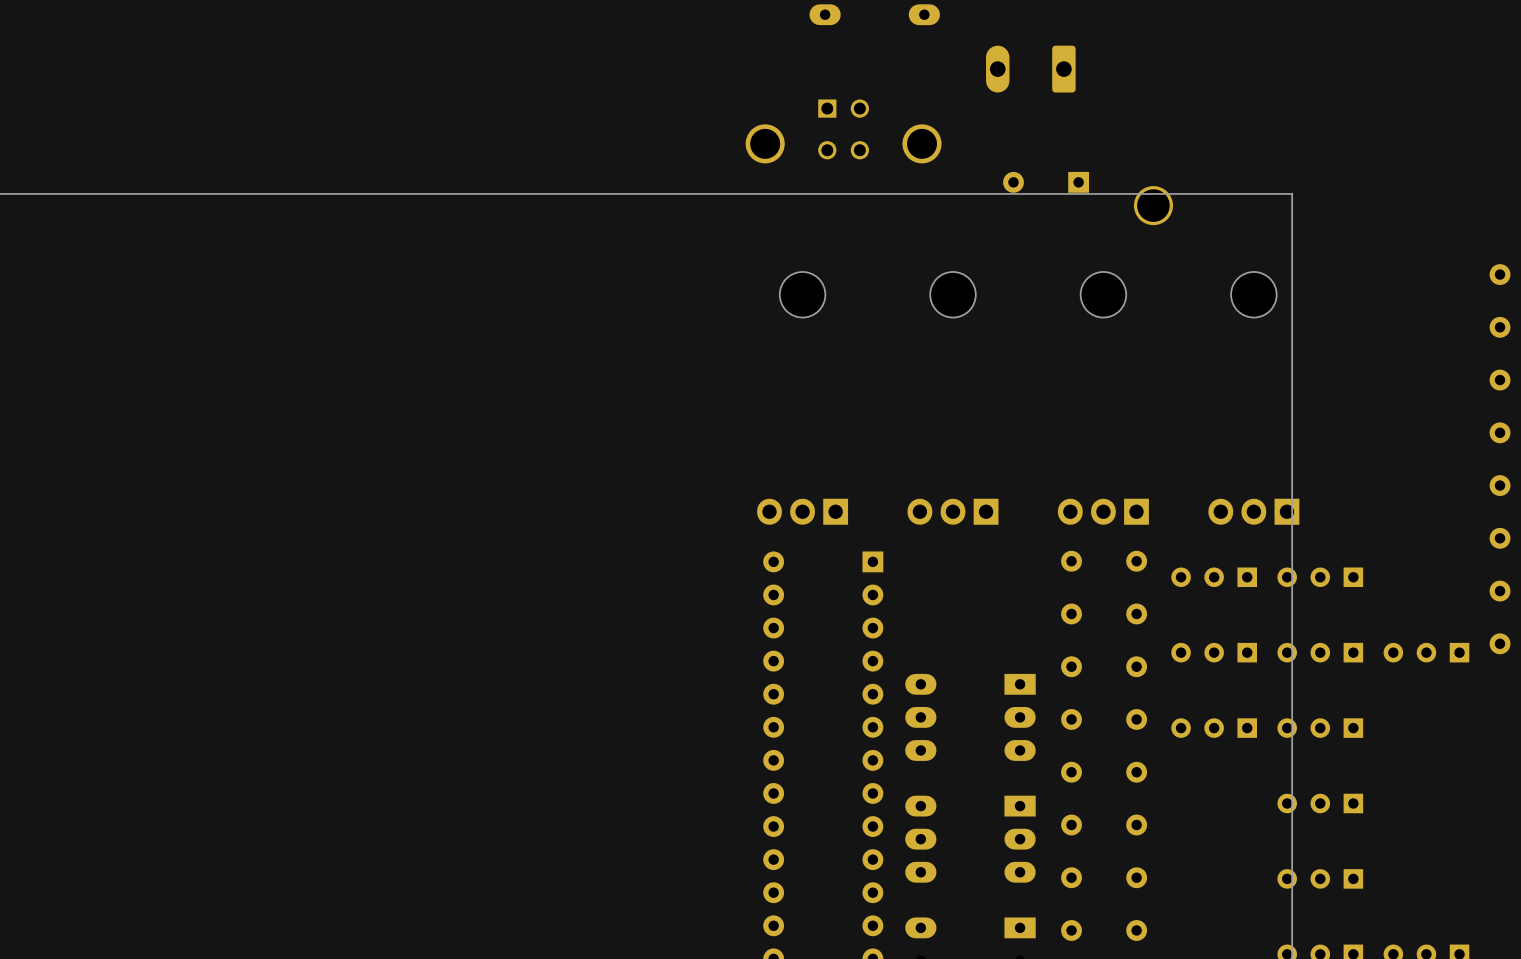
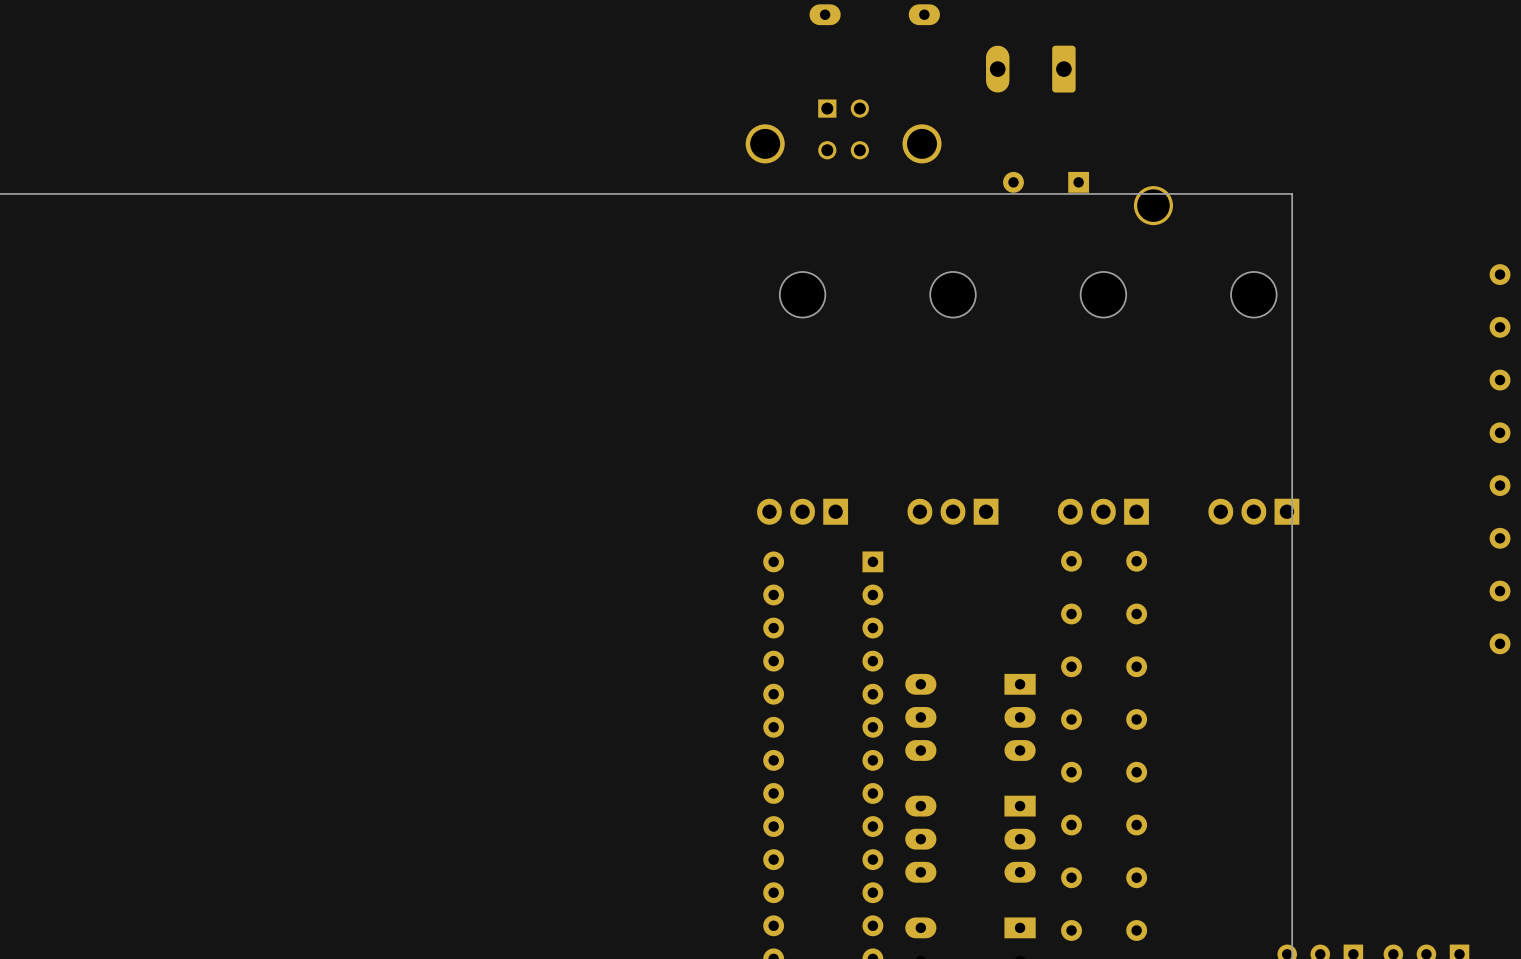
part: (1214, 577) -> none
part: (1320, 577) -> none
part: (1214, 652) -> none
part: (1320, 652) -> none
part: (1426, 652) -> none
part: (1214, 728) -> none
part: (1320, 728) -> none
part: (1320, 803) -> none
part: (1320, 878) -> none

